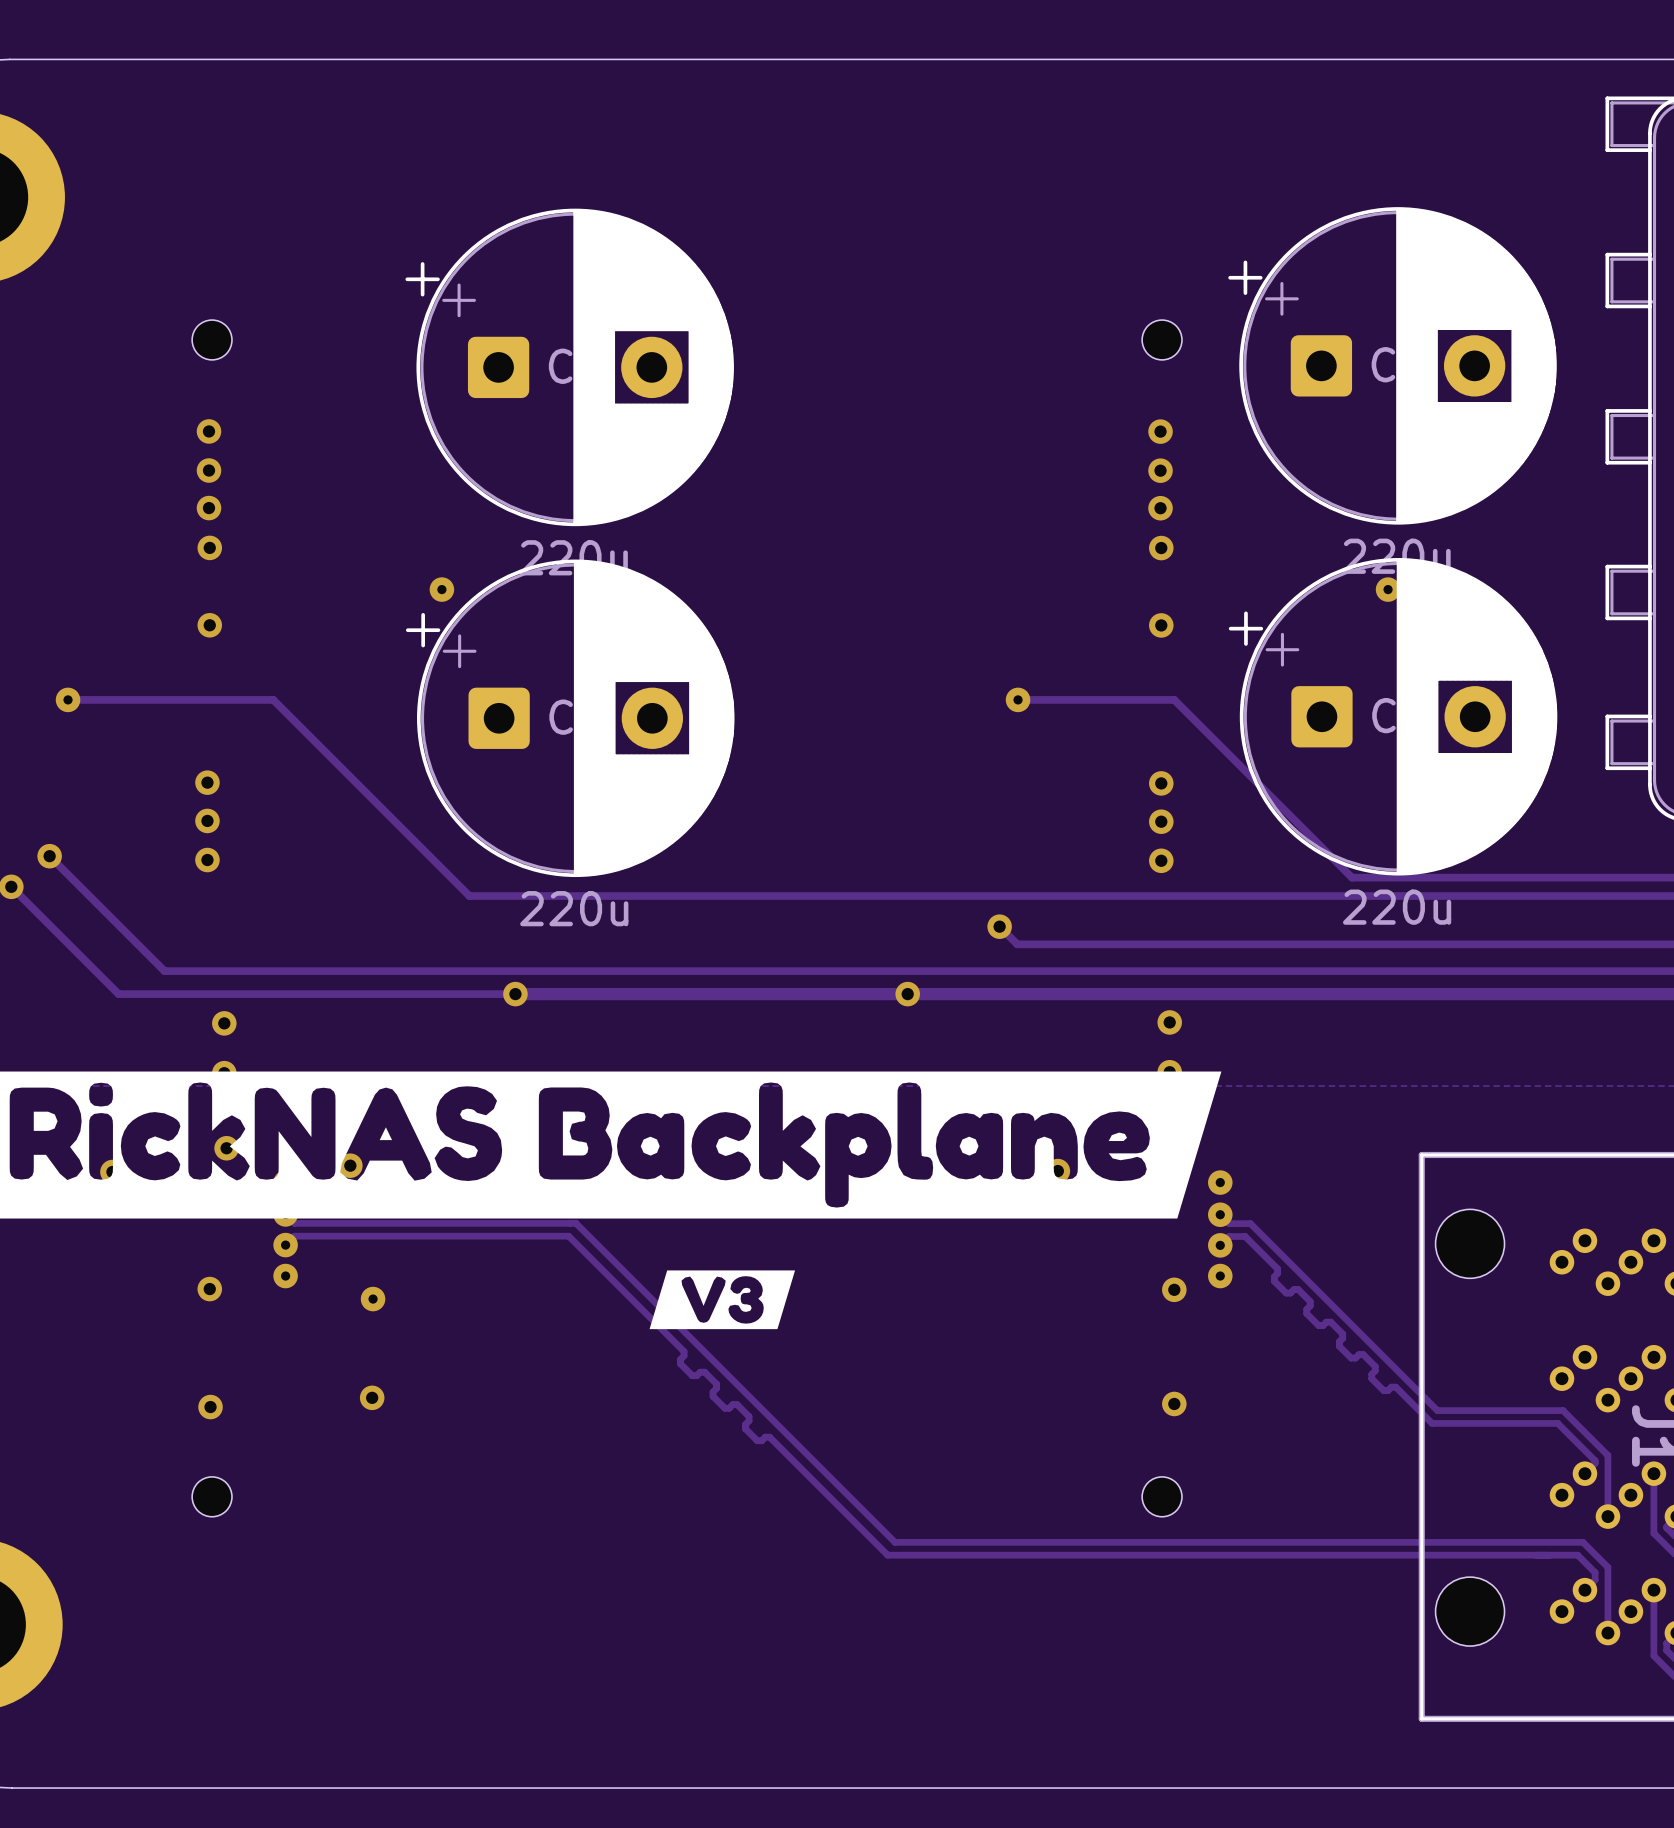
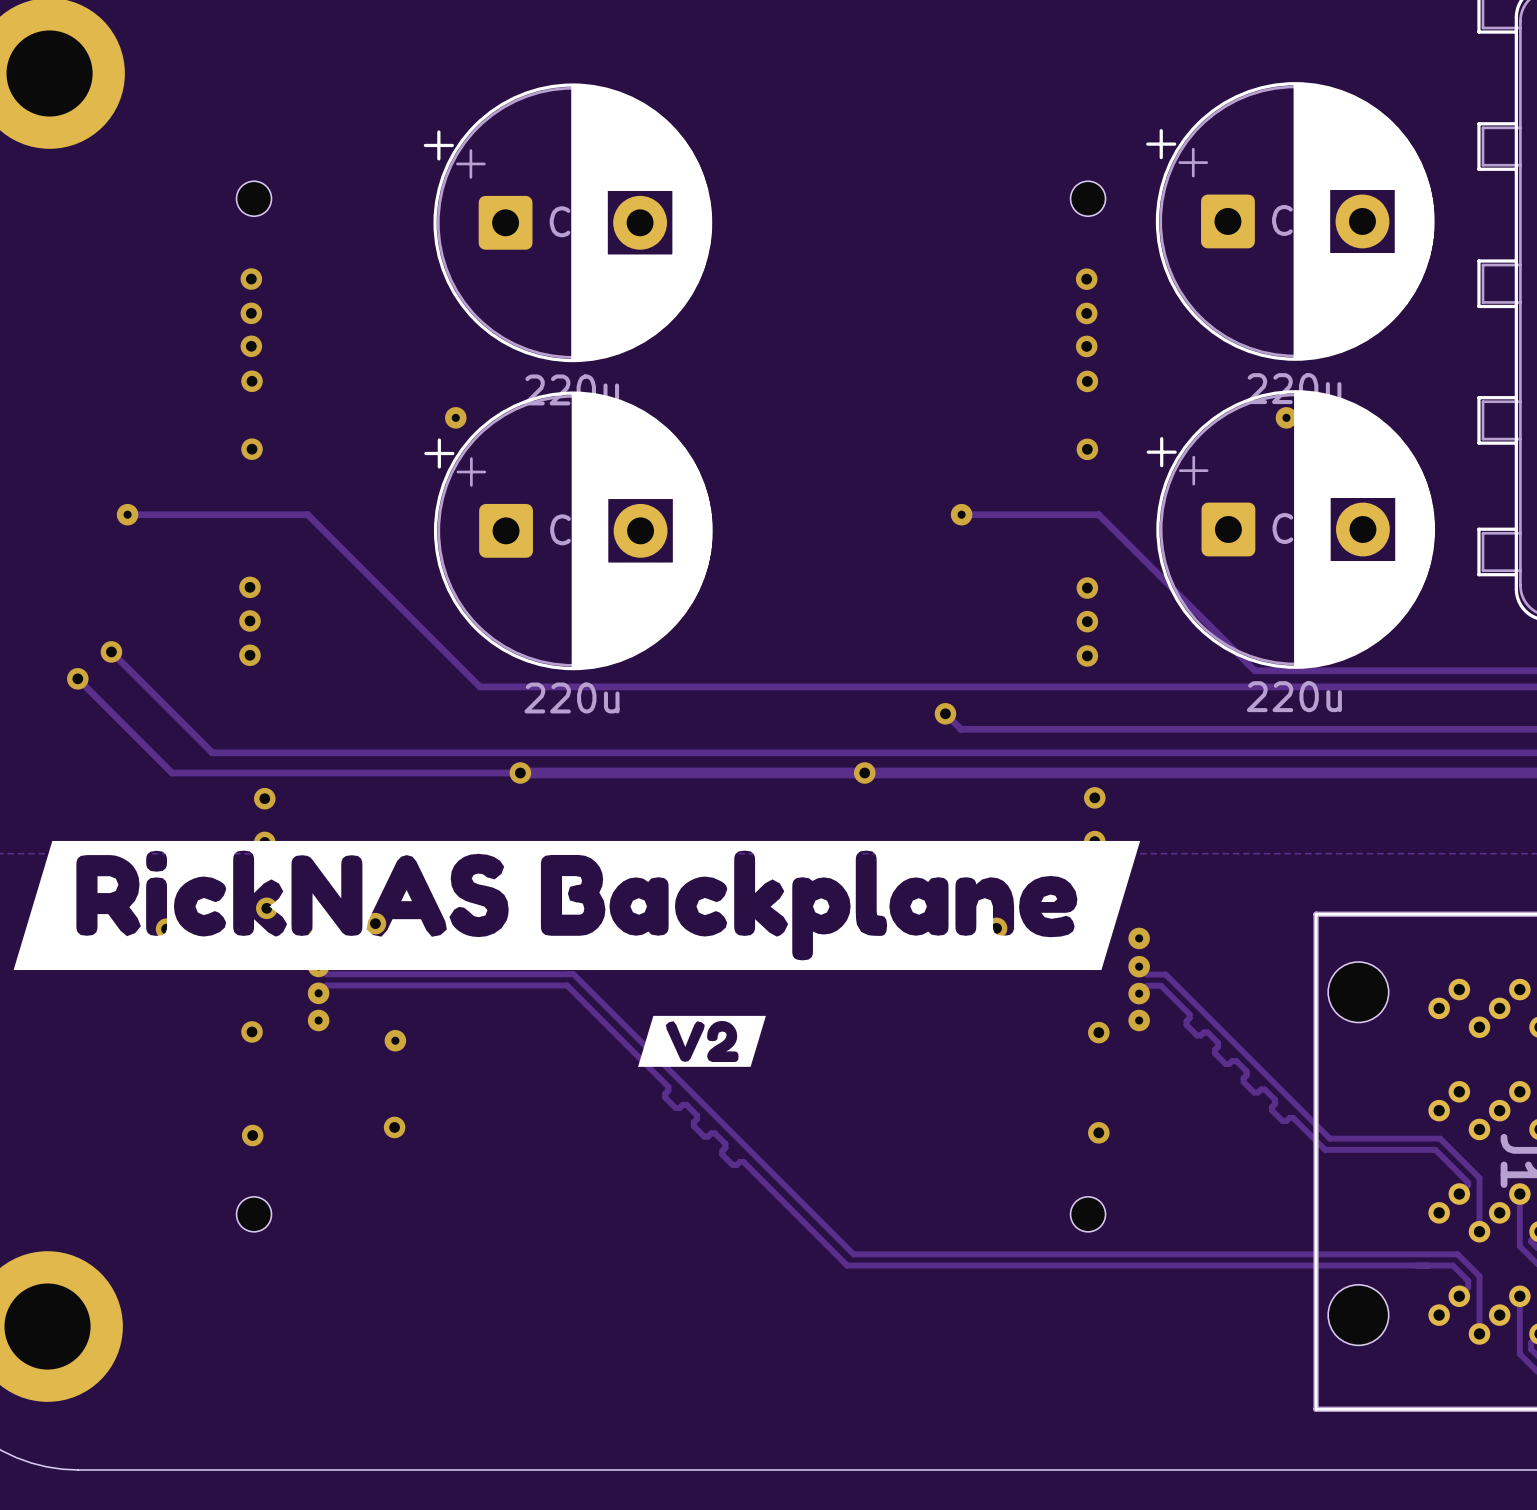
drawing shape: [649, 1270, 796, 1330] -> [638, 1015, 766, 1067]

